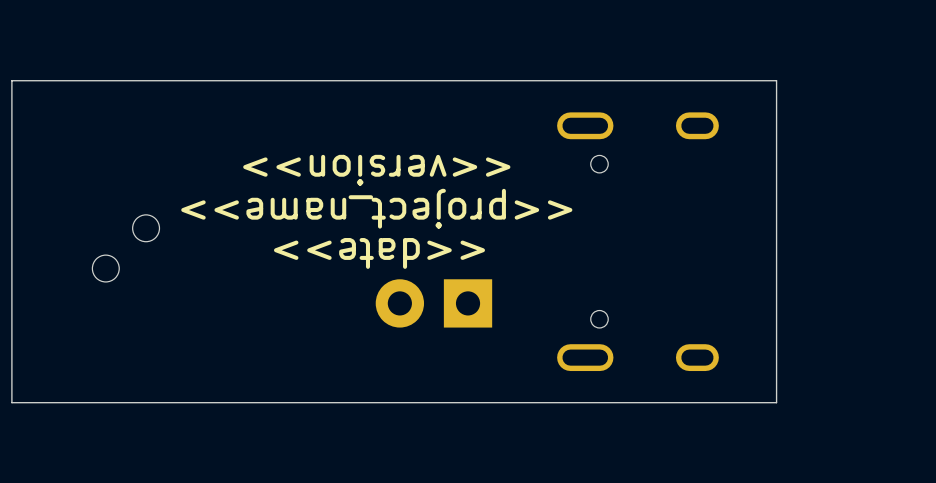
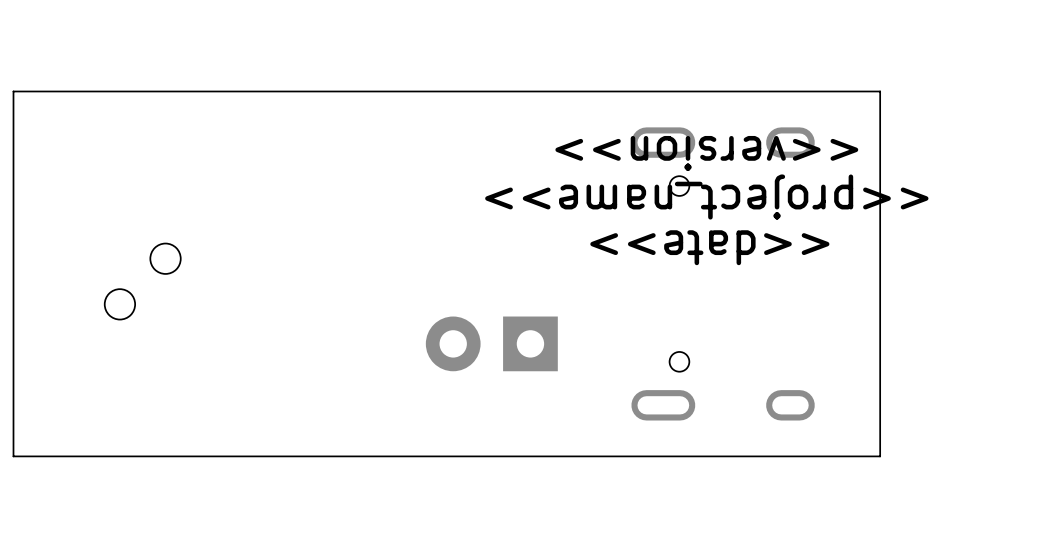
text position: <<version>> (376, 170) -> <<version>> (706, 153)
text position: <<project_name>> (376, 208) -> <<project_name>> (706, 197)
text position: <<date>> (379, 253) -> <<date>> (709, 247)

